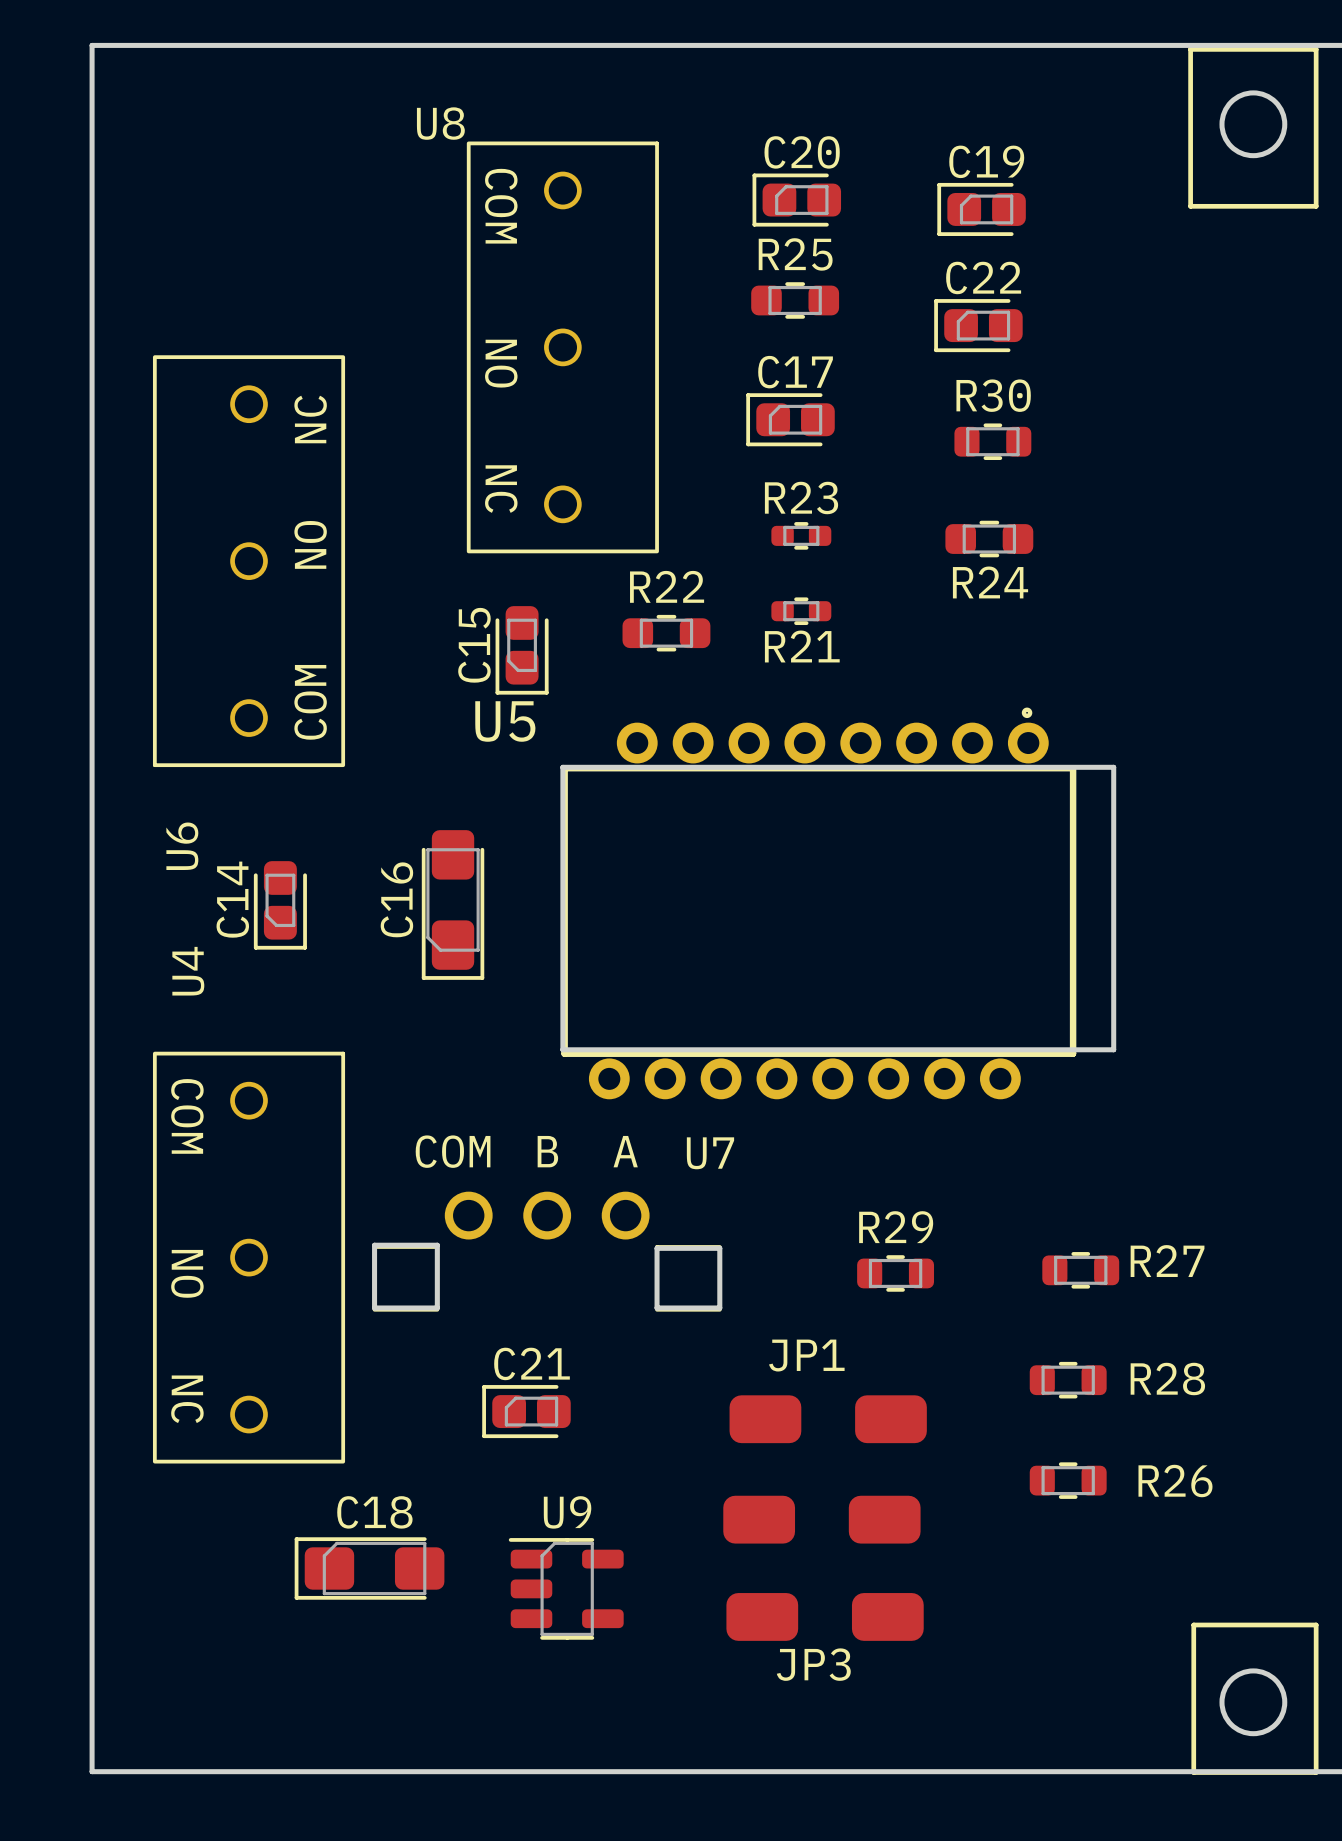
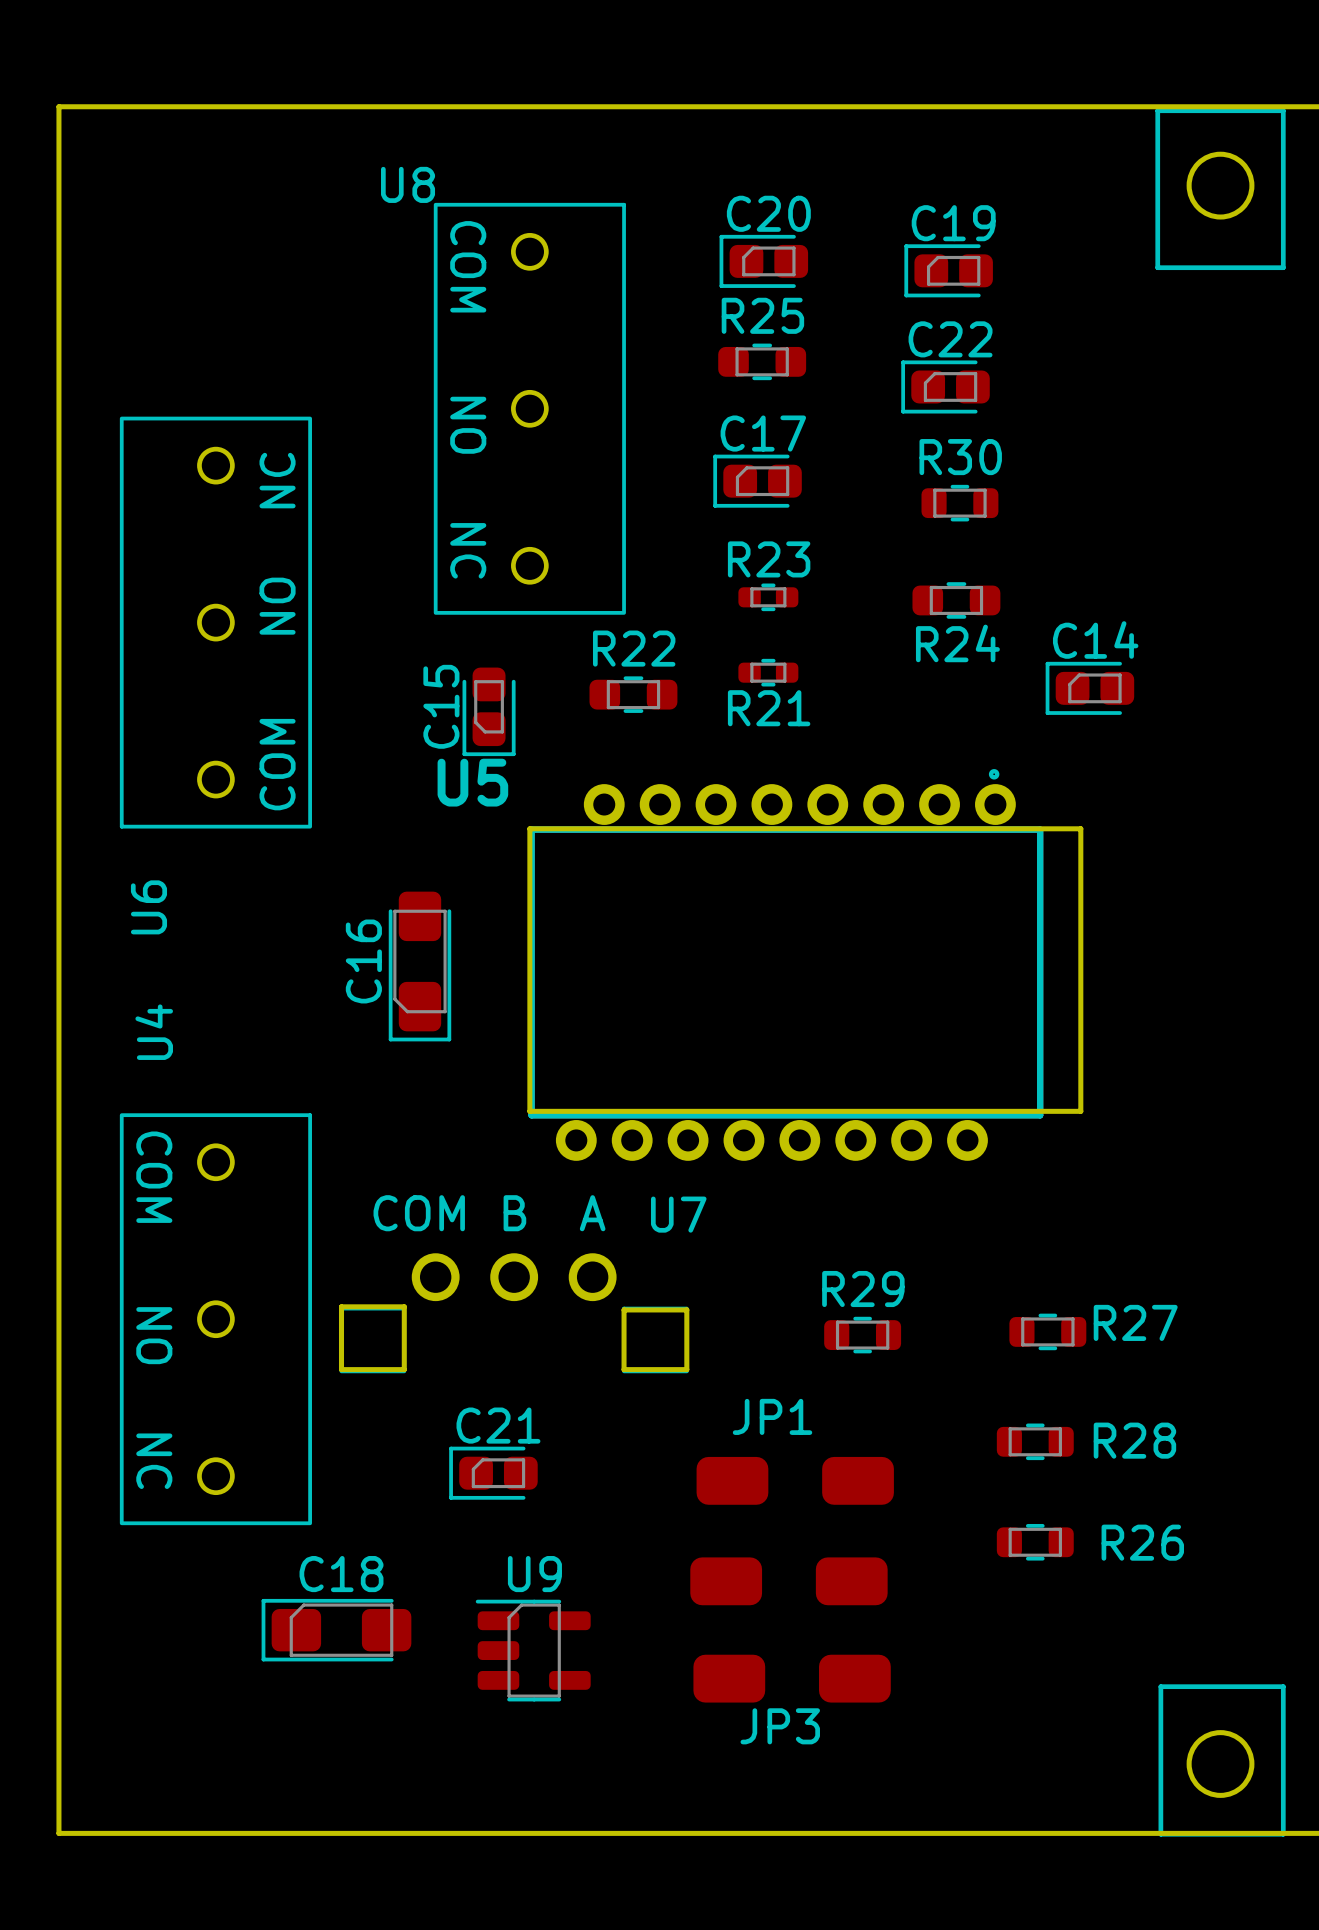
C14 rotation: 0° (280, 905) -> 90° clockwise (1089, 688)
C14 position: (280, 905) -> (1089, 688)

